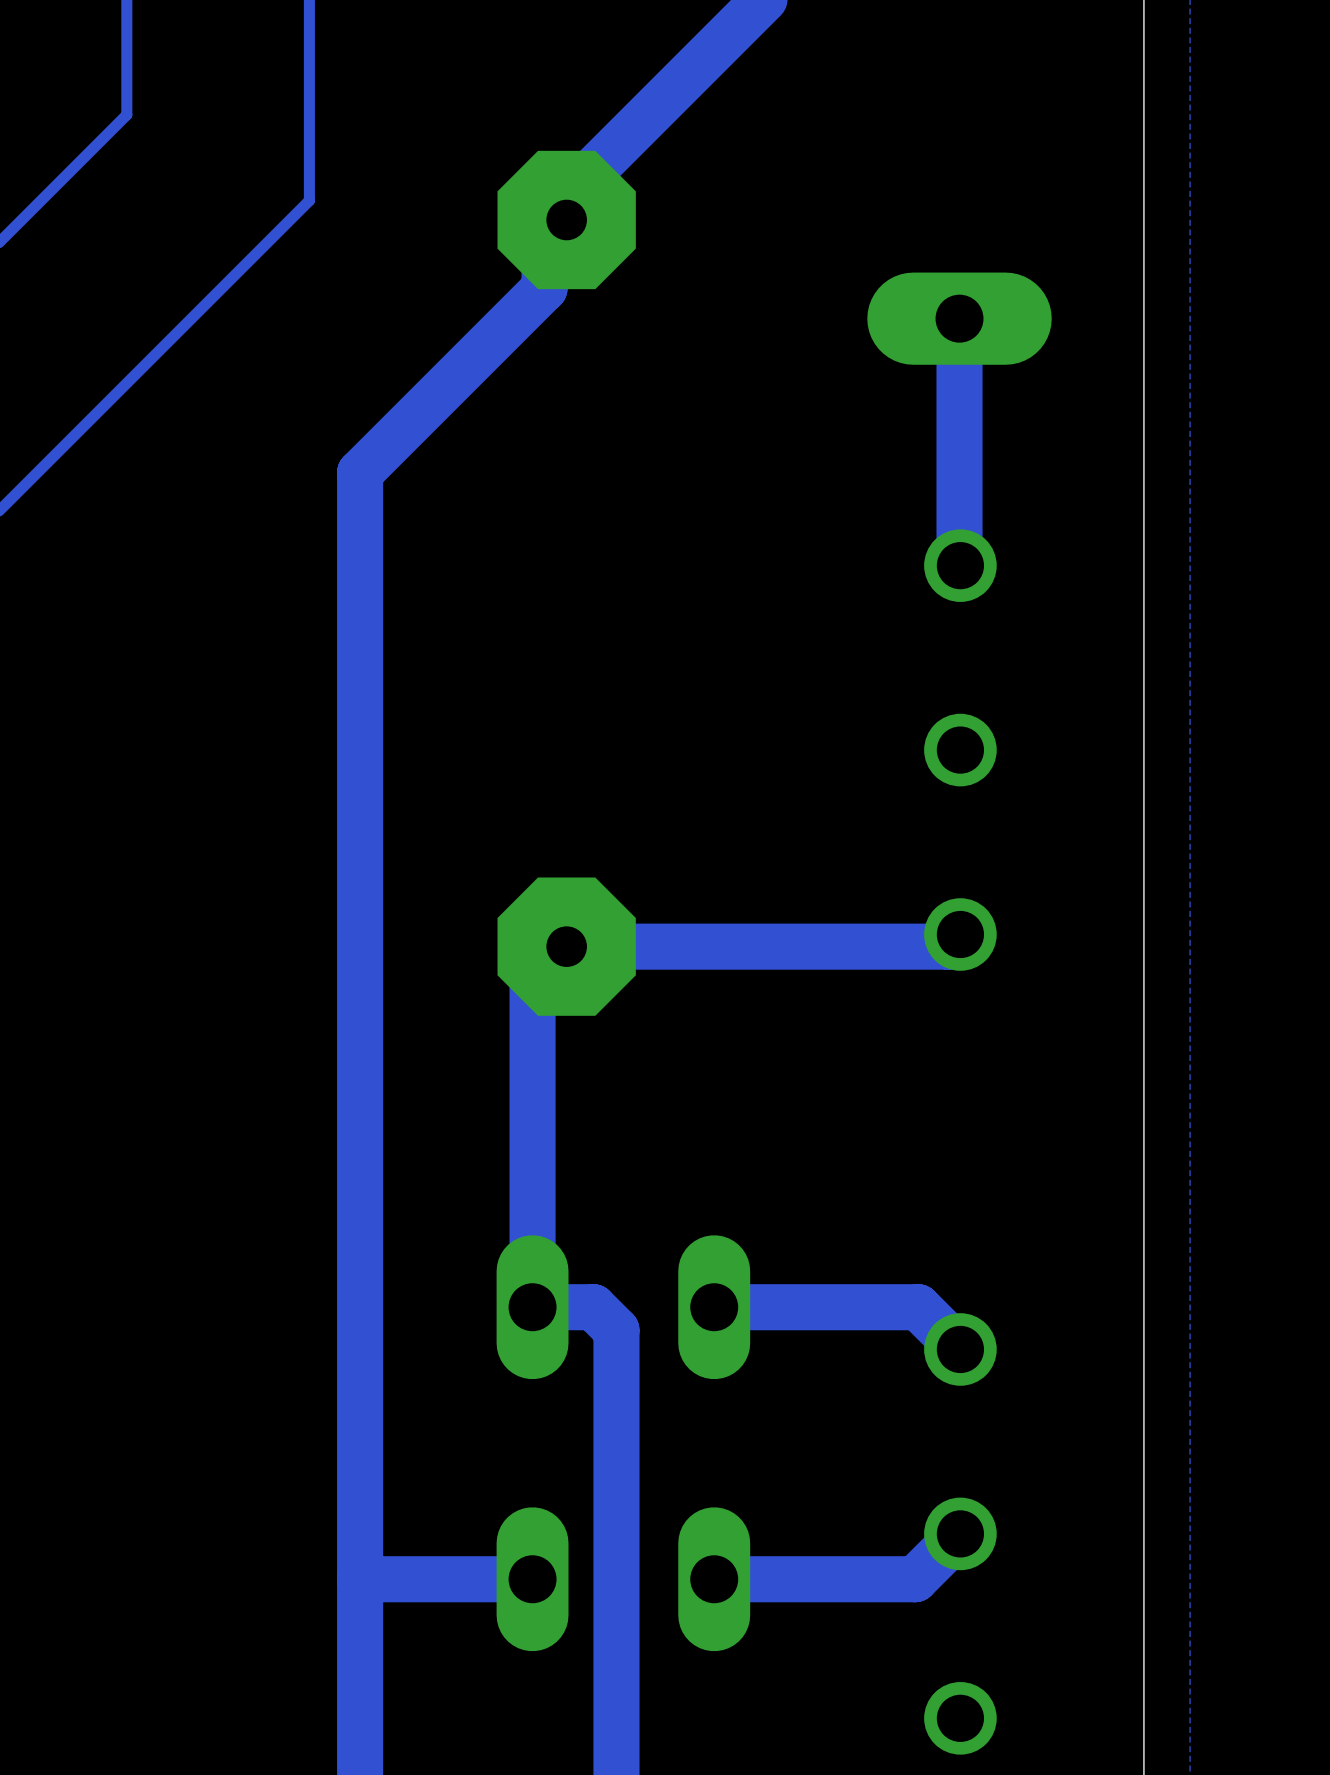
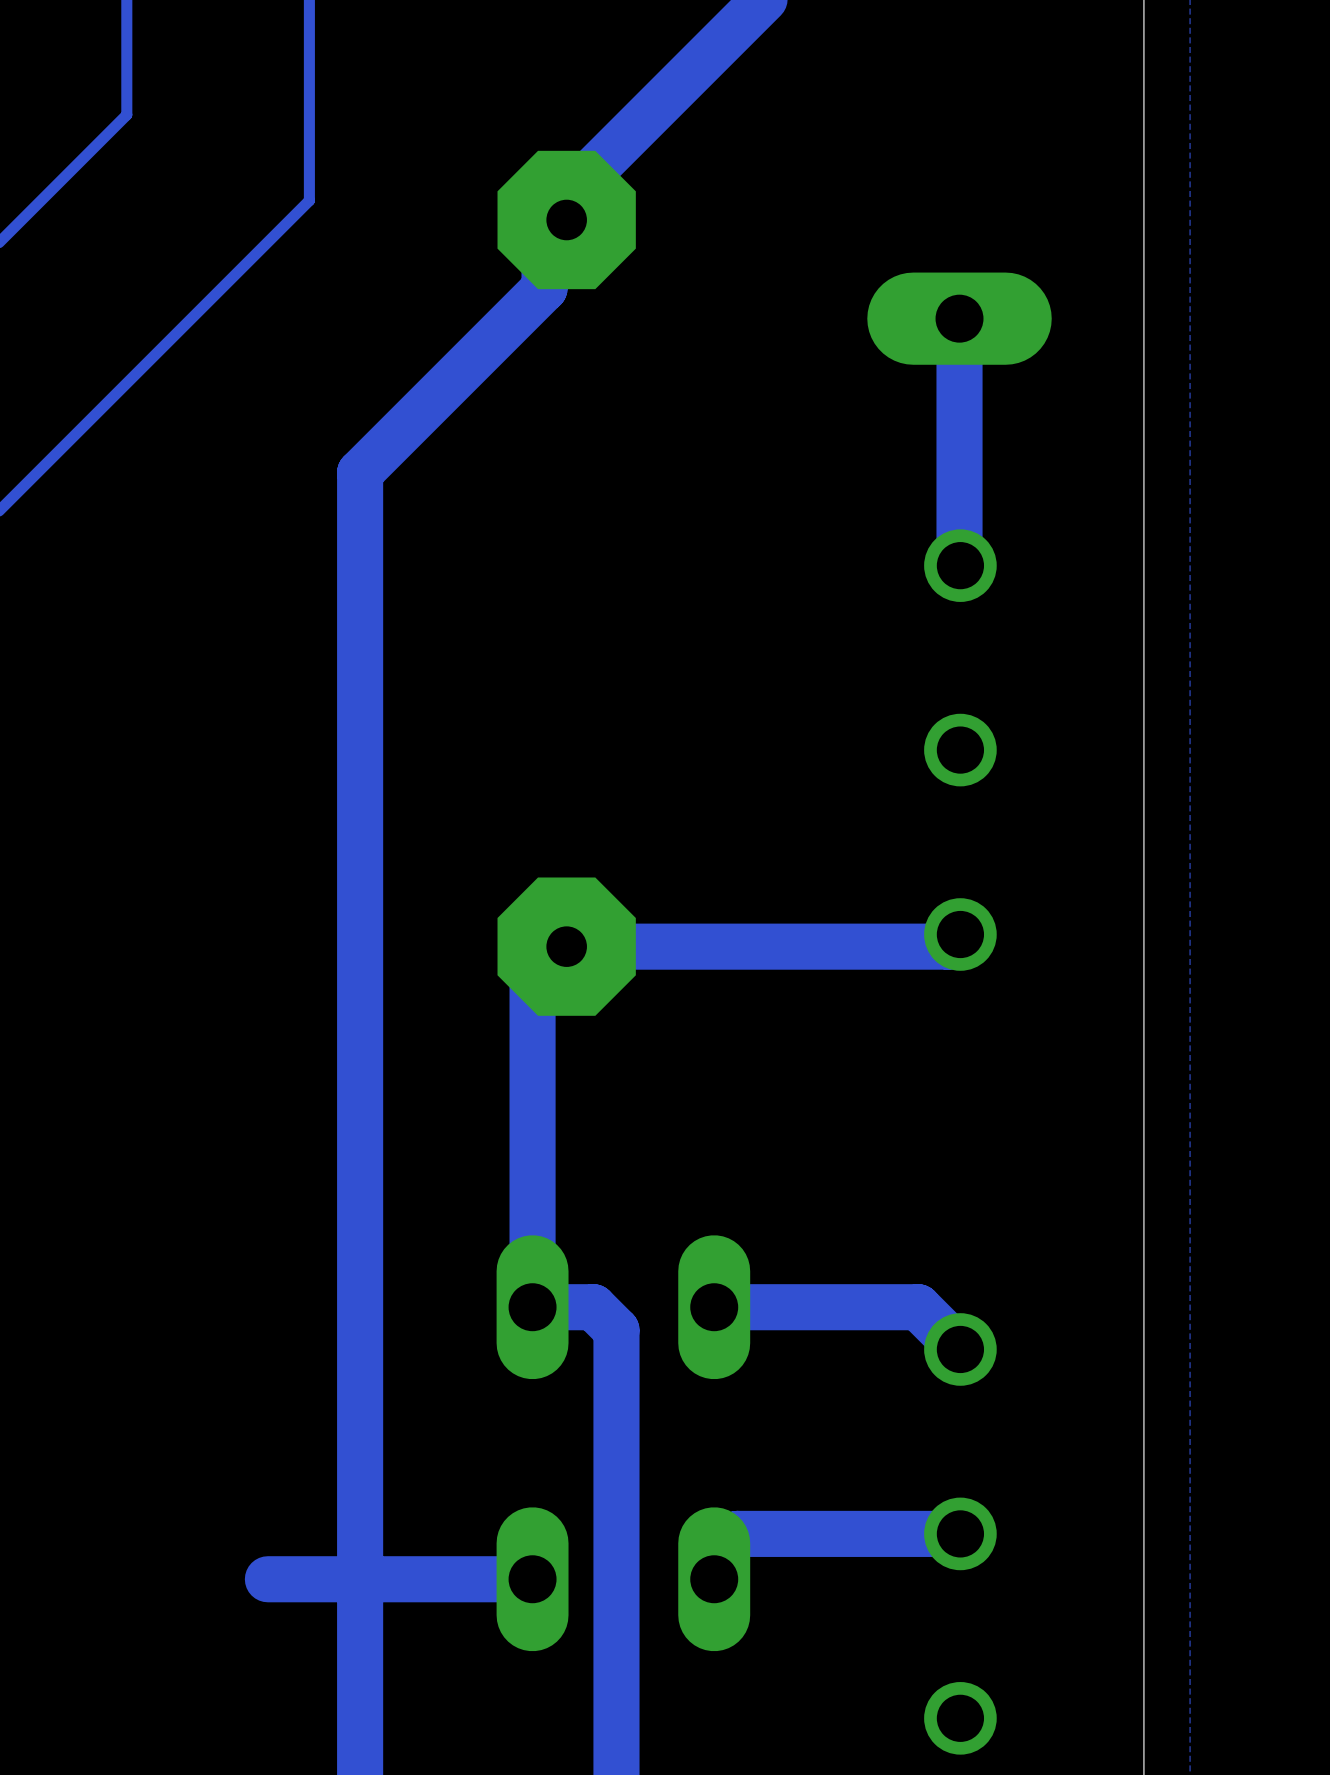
bottom track: (960, 1533) (915, 1579) (714, 1579) -> (960, 1533) (737, 1533) (714, 1556) (714, 1579)
bottom track: none -> (360, 1579) (267, 1579)

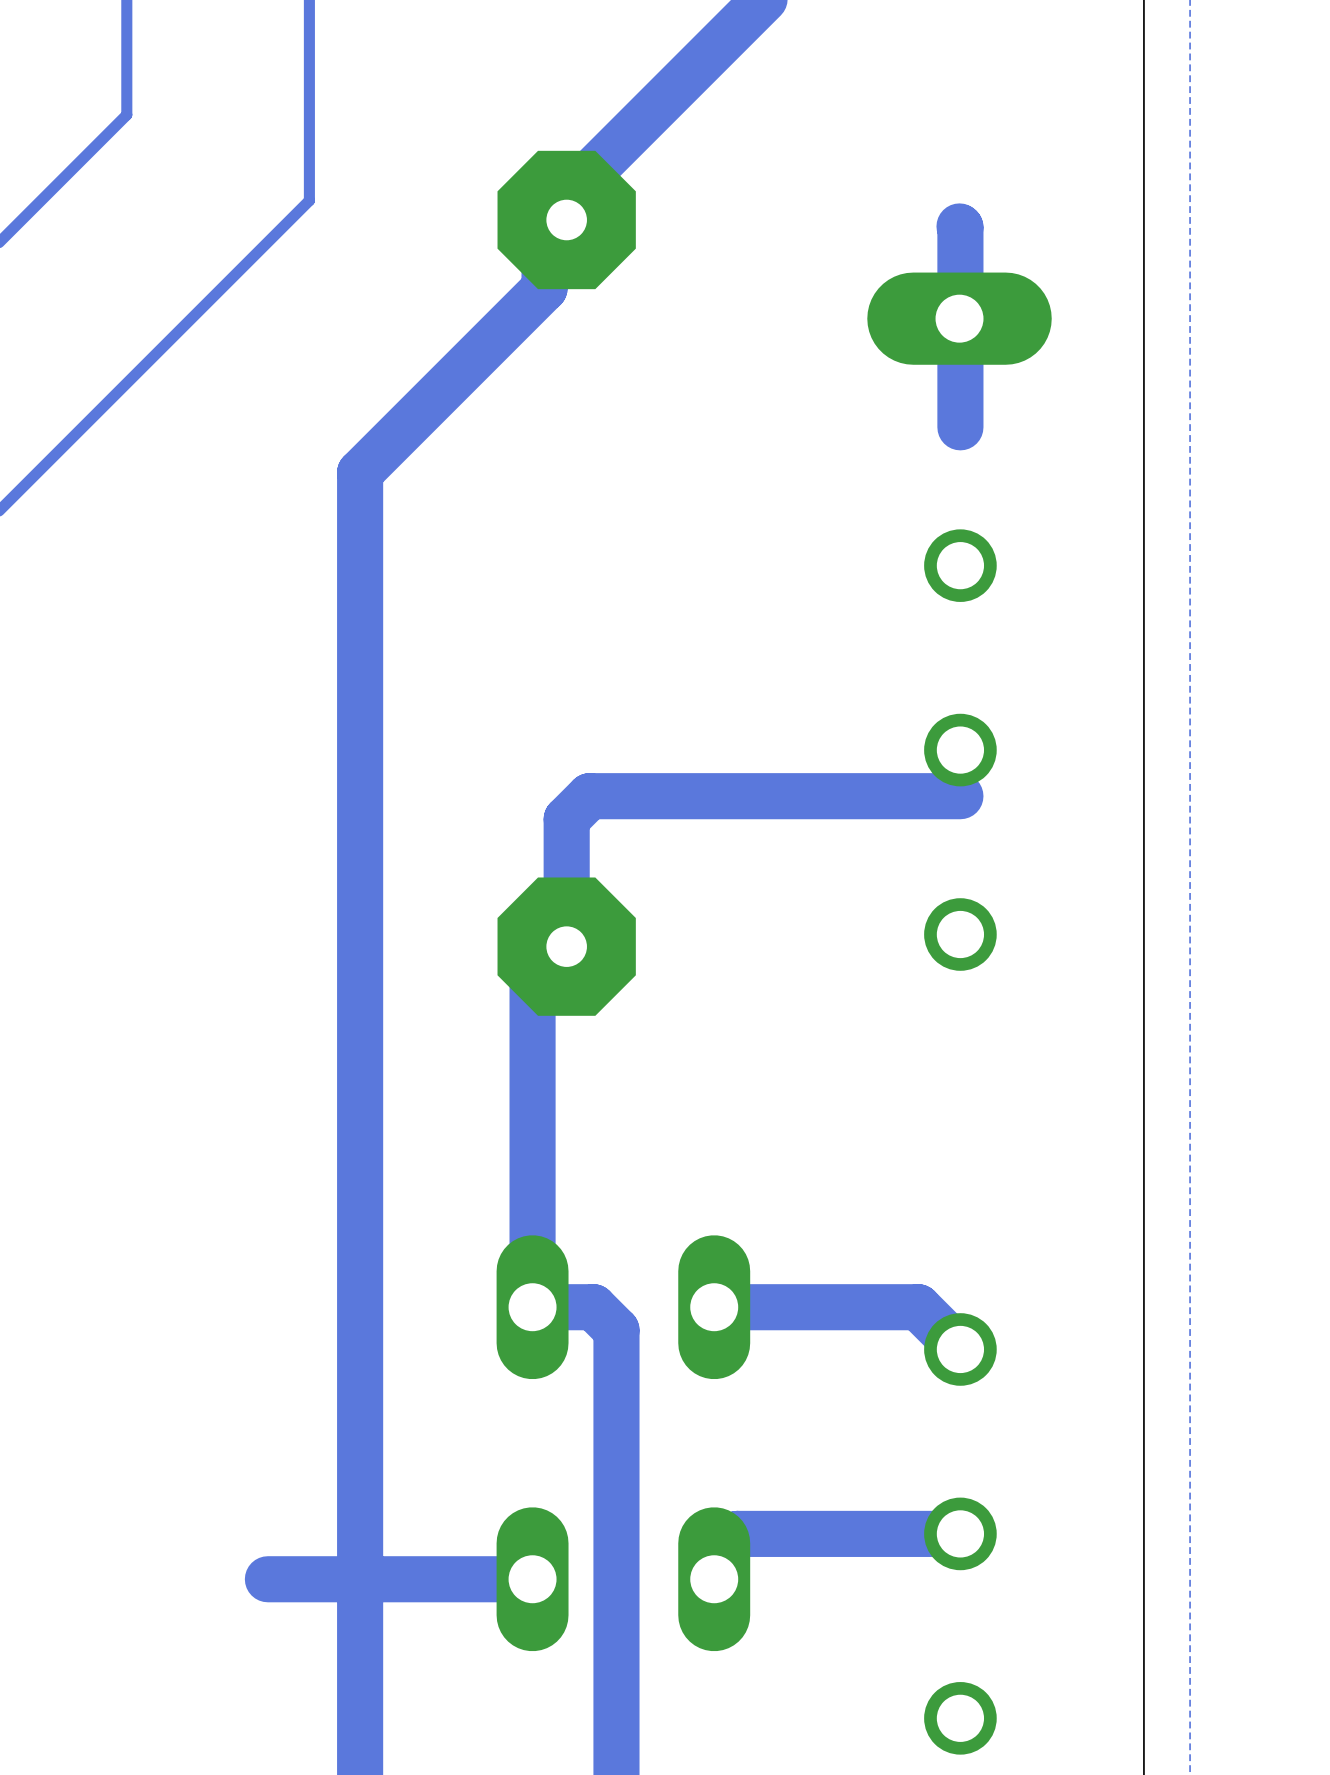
bottom track: none -> (959, 226) (960, 427)
bottom track: (959, 318) (960, 565) -> none
bottom track: (960, 934) (948, 946) (566, 946) -> (960, 796) (589, 796) (566, 819) (566, 946)

